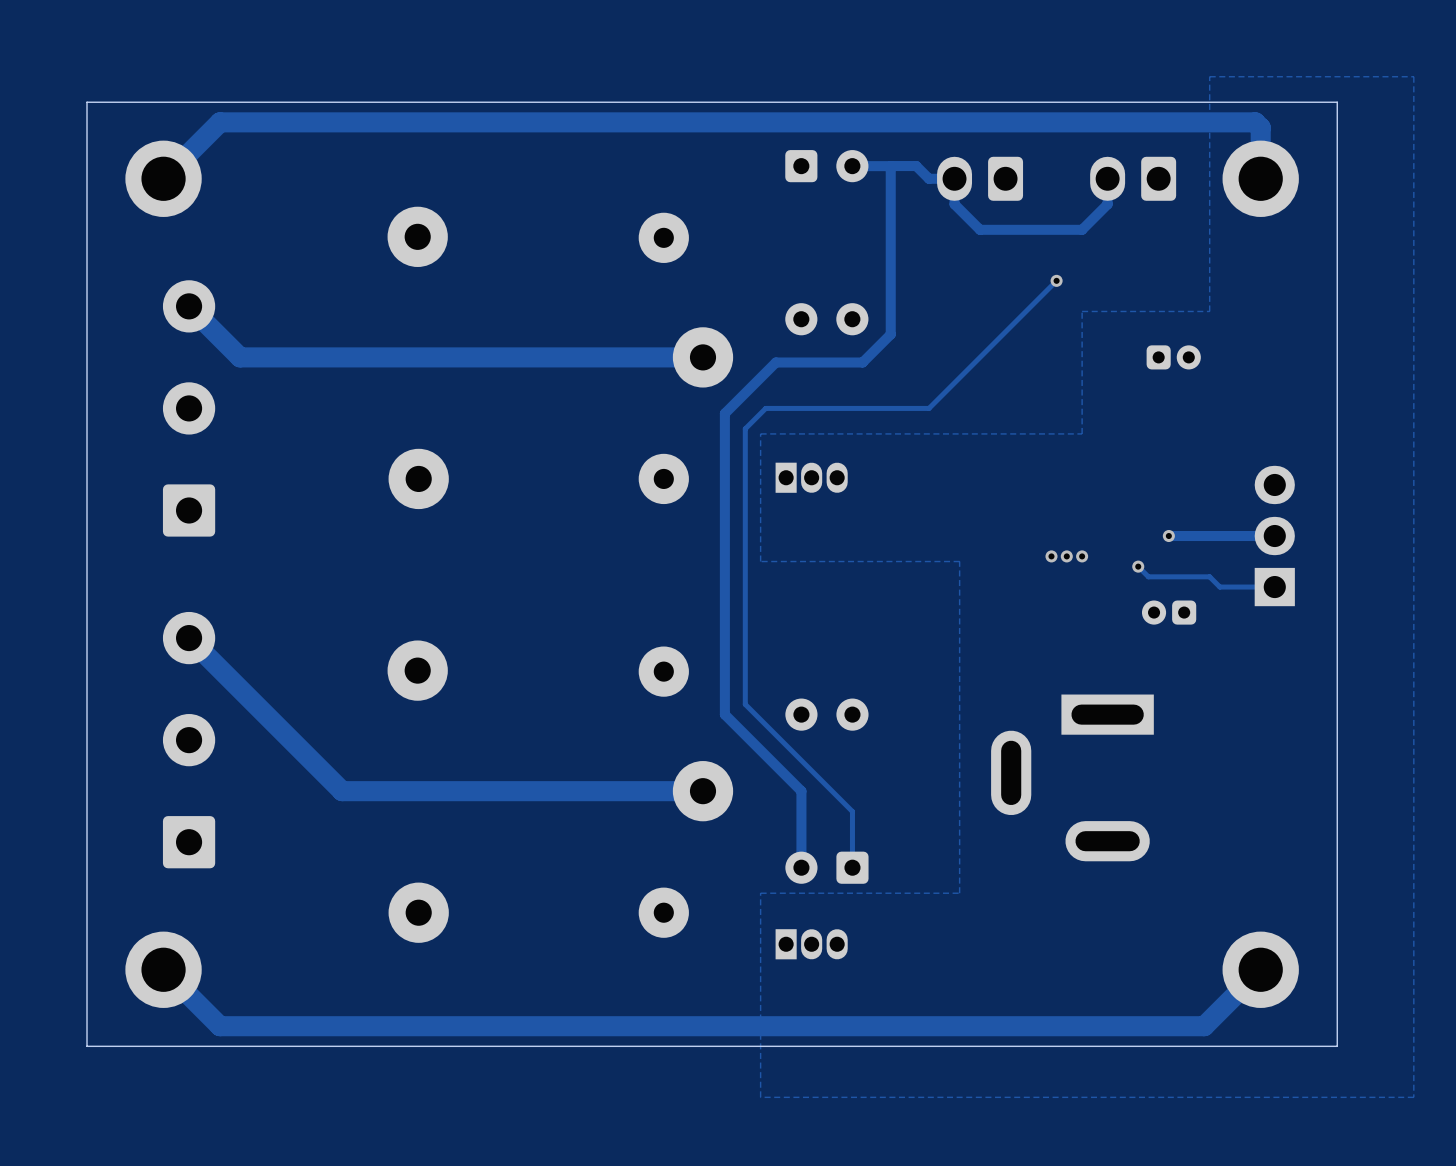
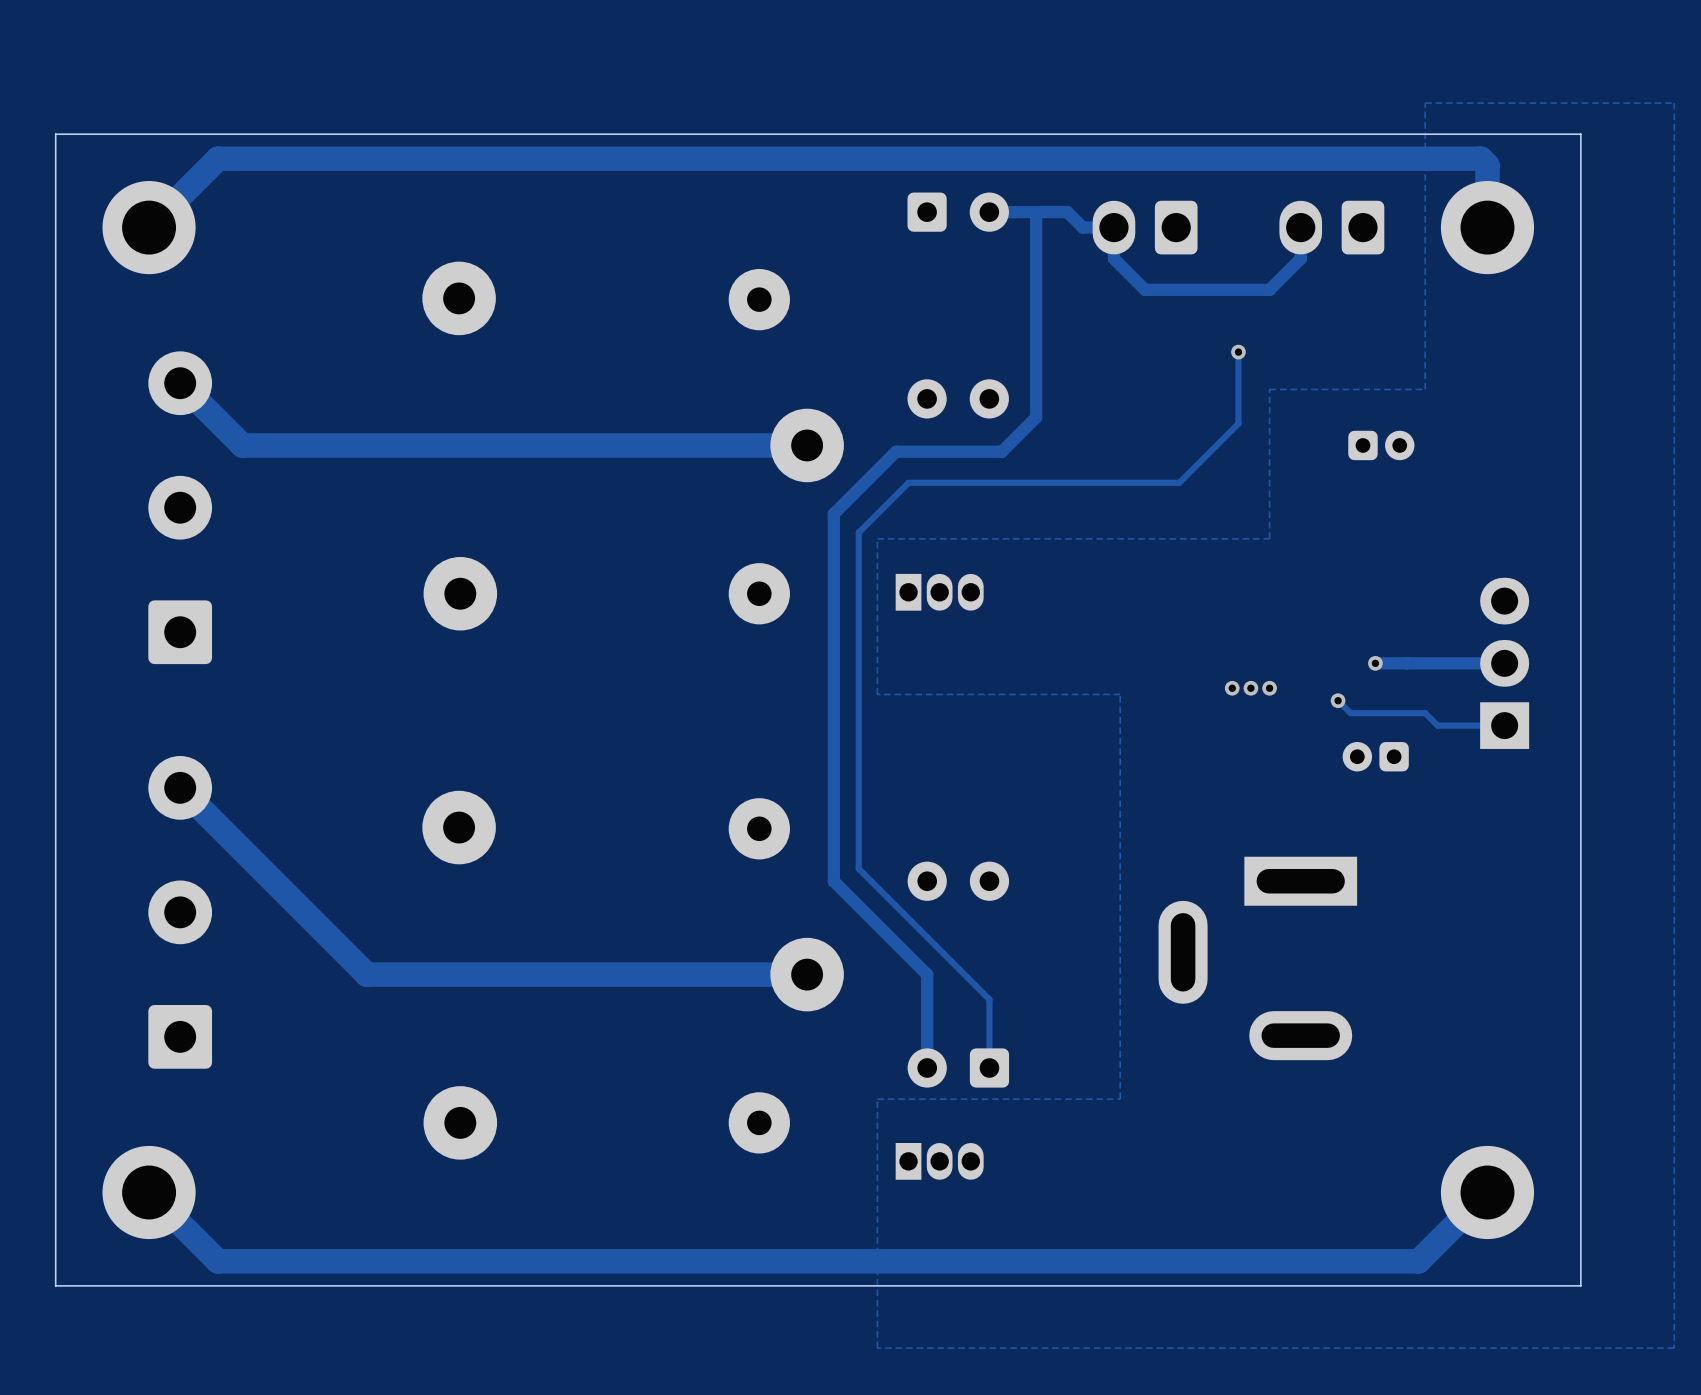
track: (1056, 280) (929, 408) (765, 408) -> (1238, 352) (1238, 423) (1179, 482) (908, 482) (883, 507)

